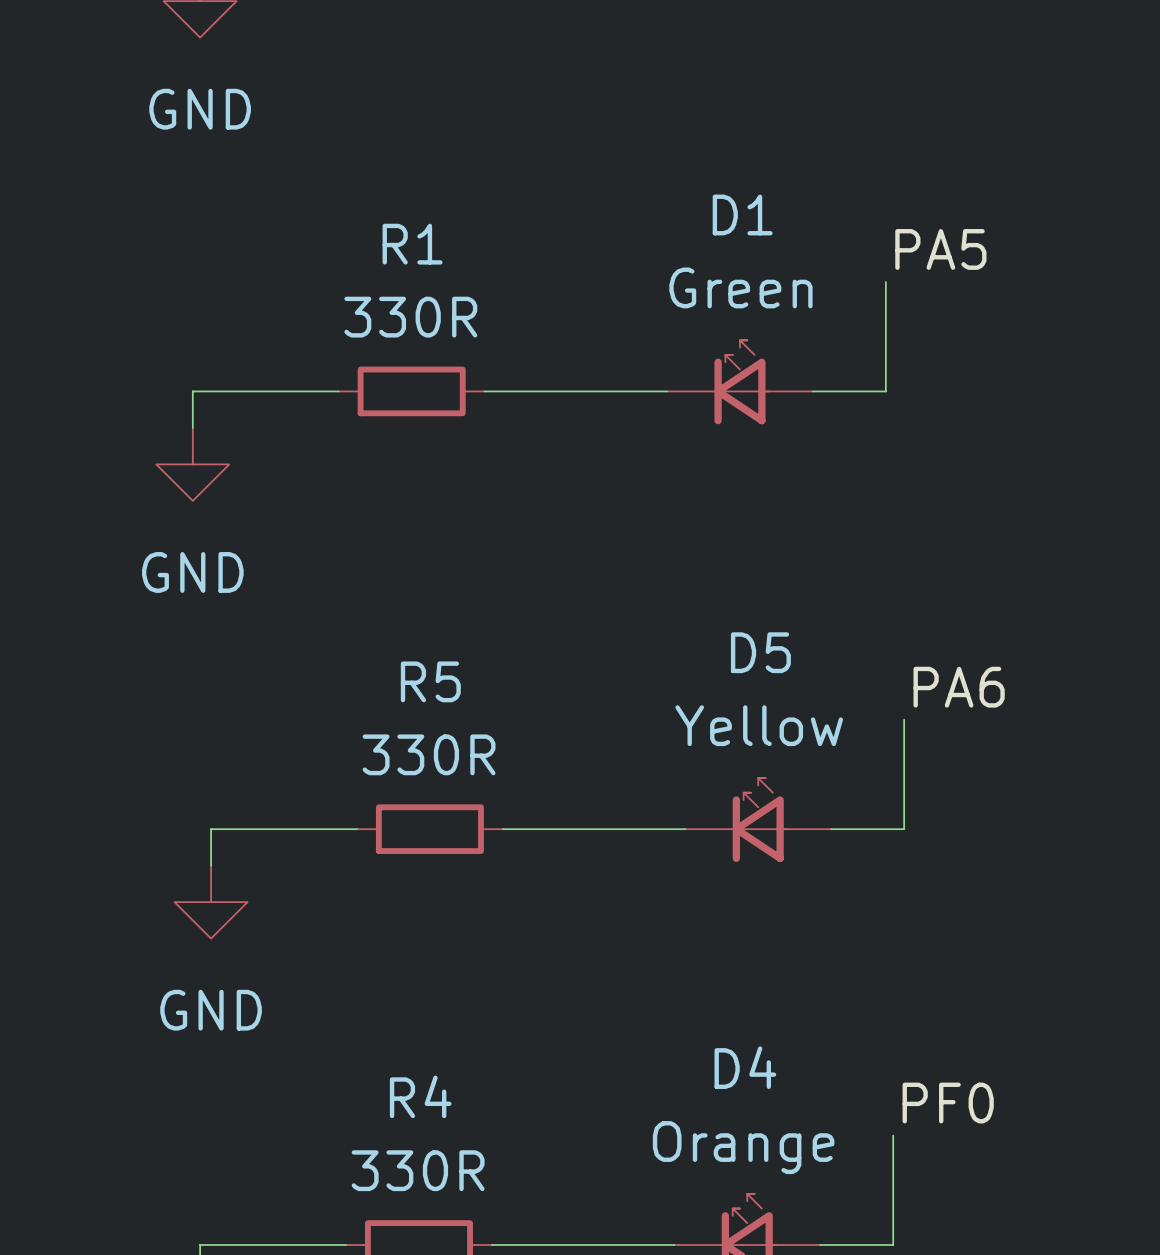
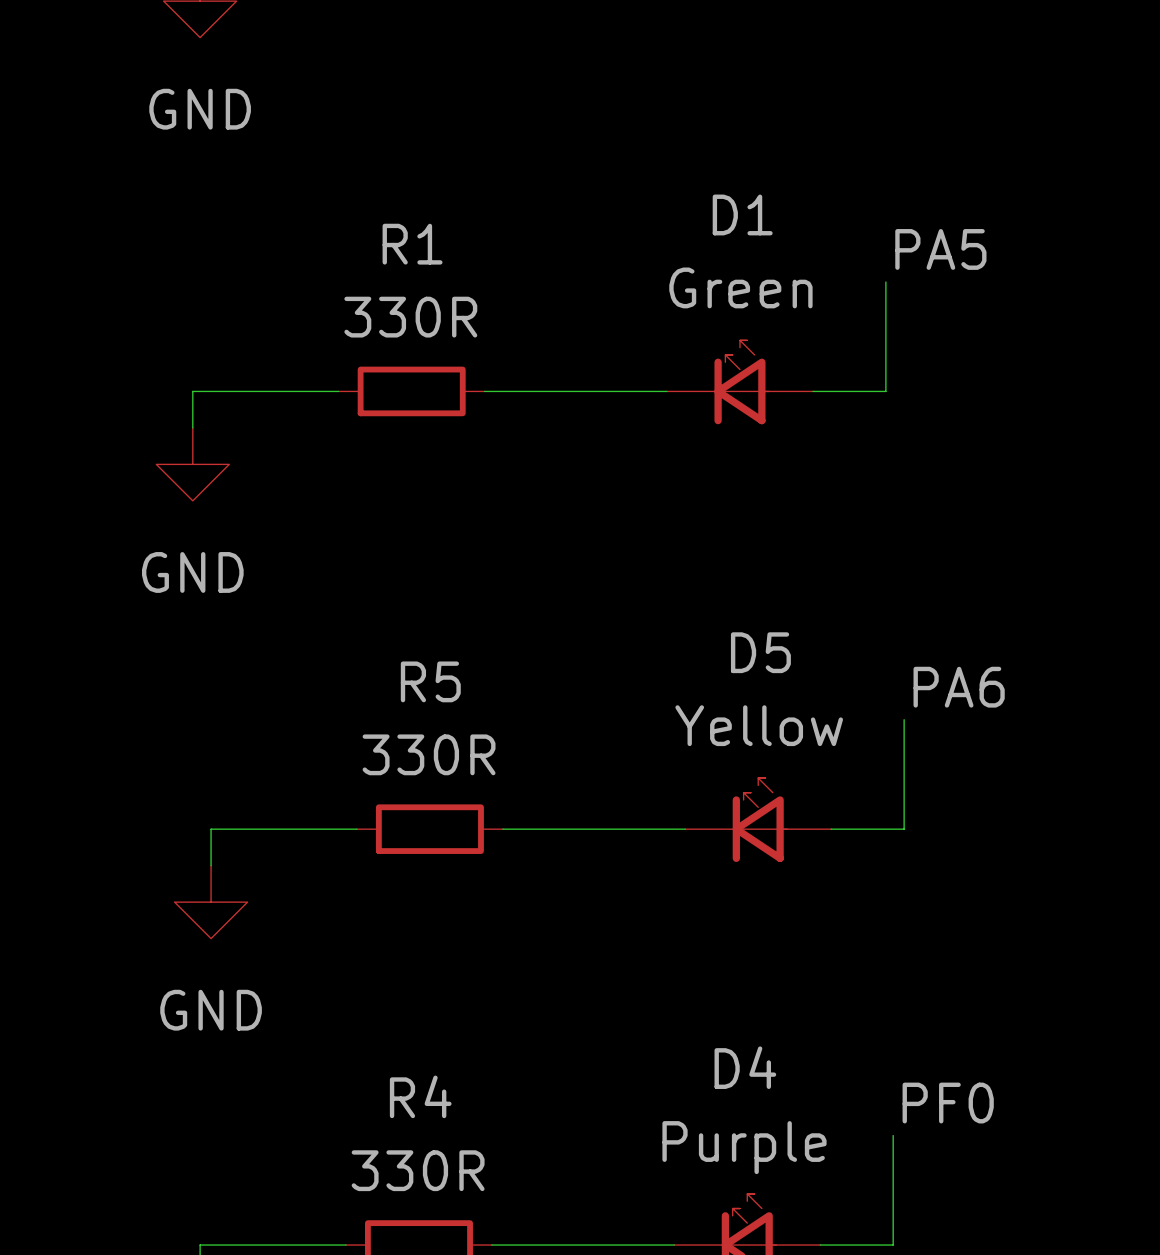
D4 value: Orange (743, 1147) -> Purple (744, 1147)

